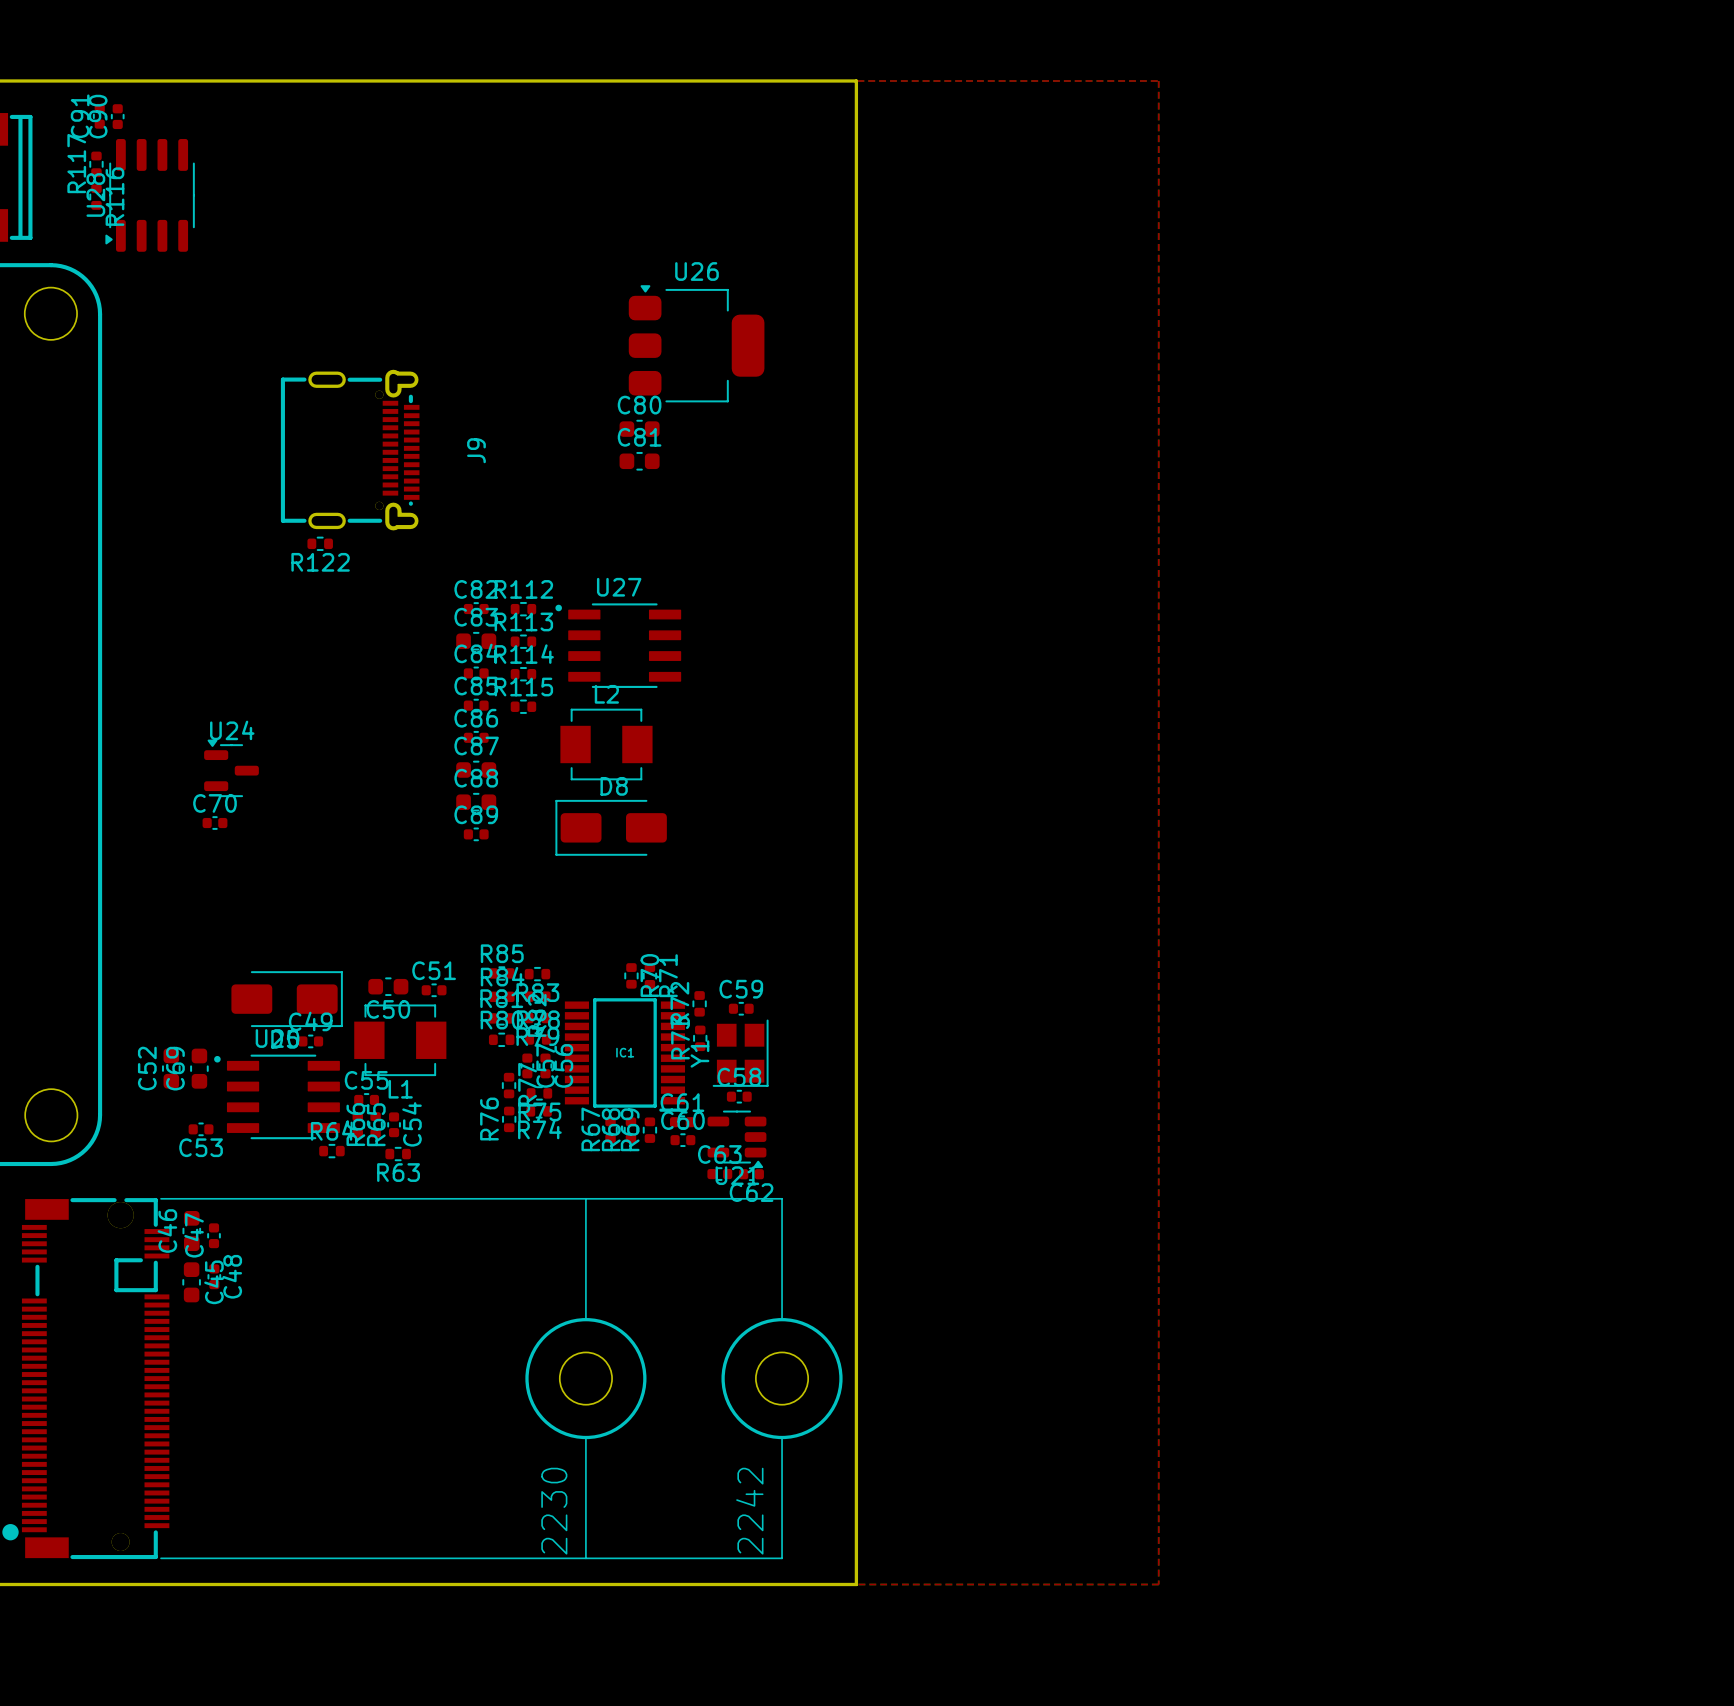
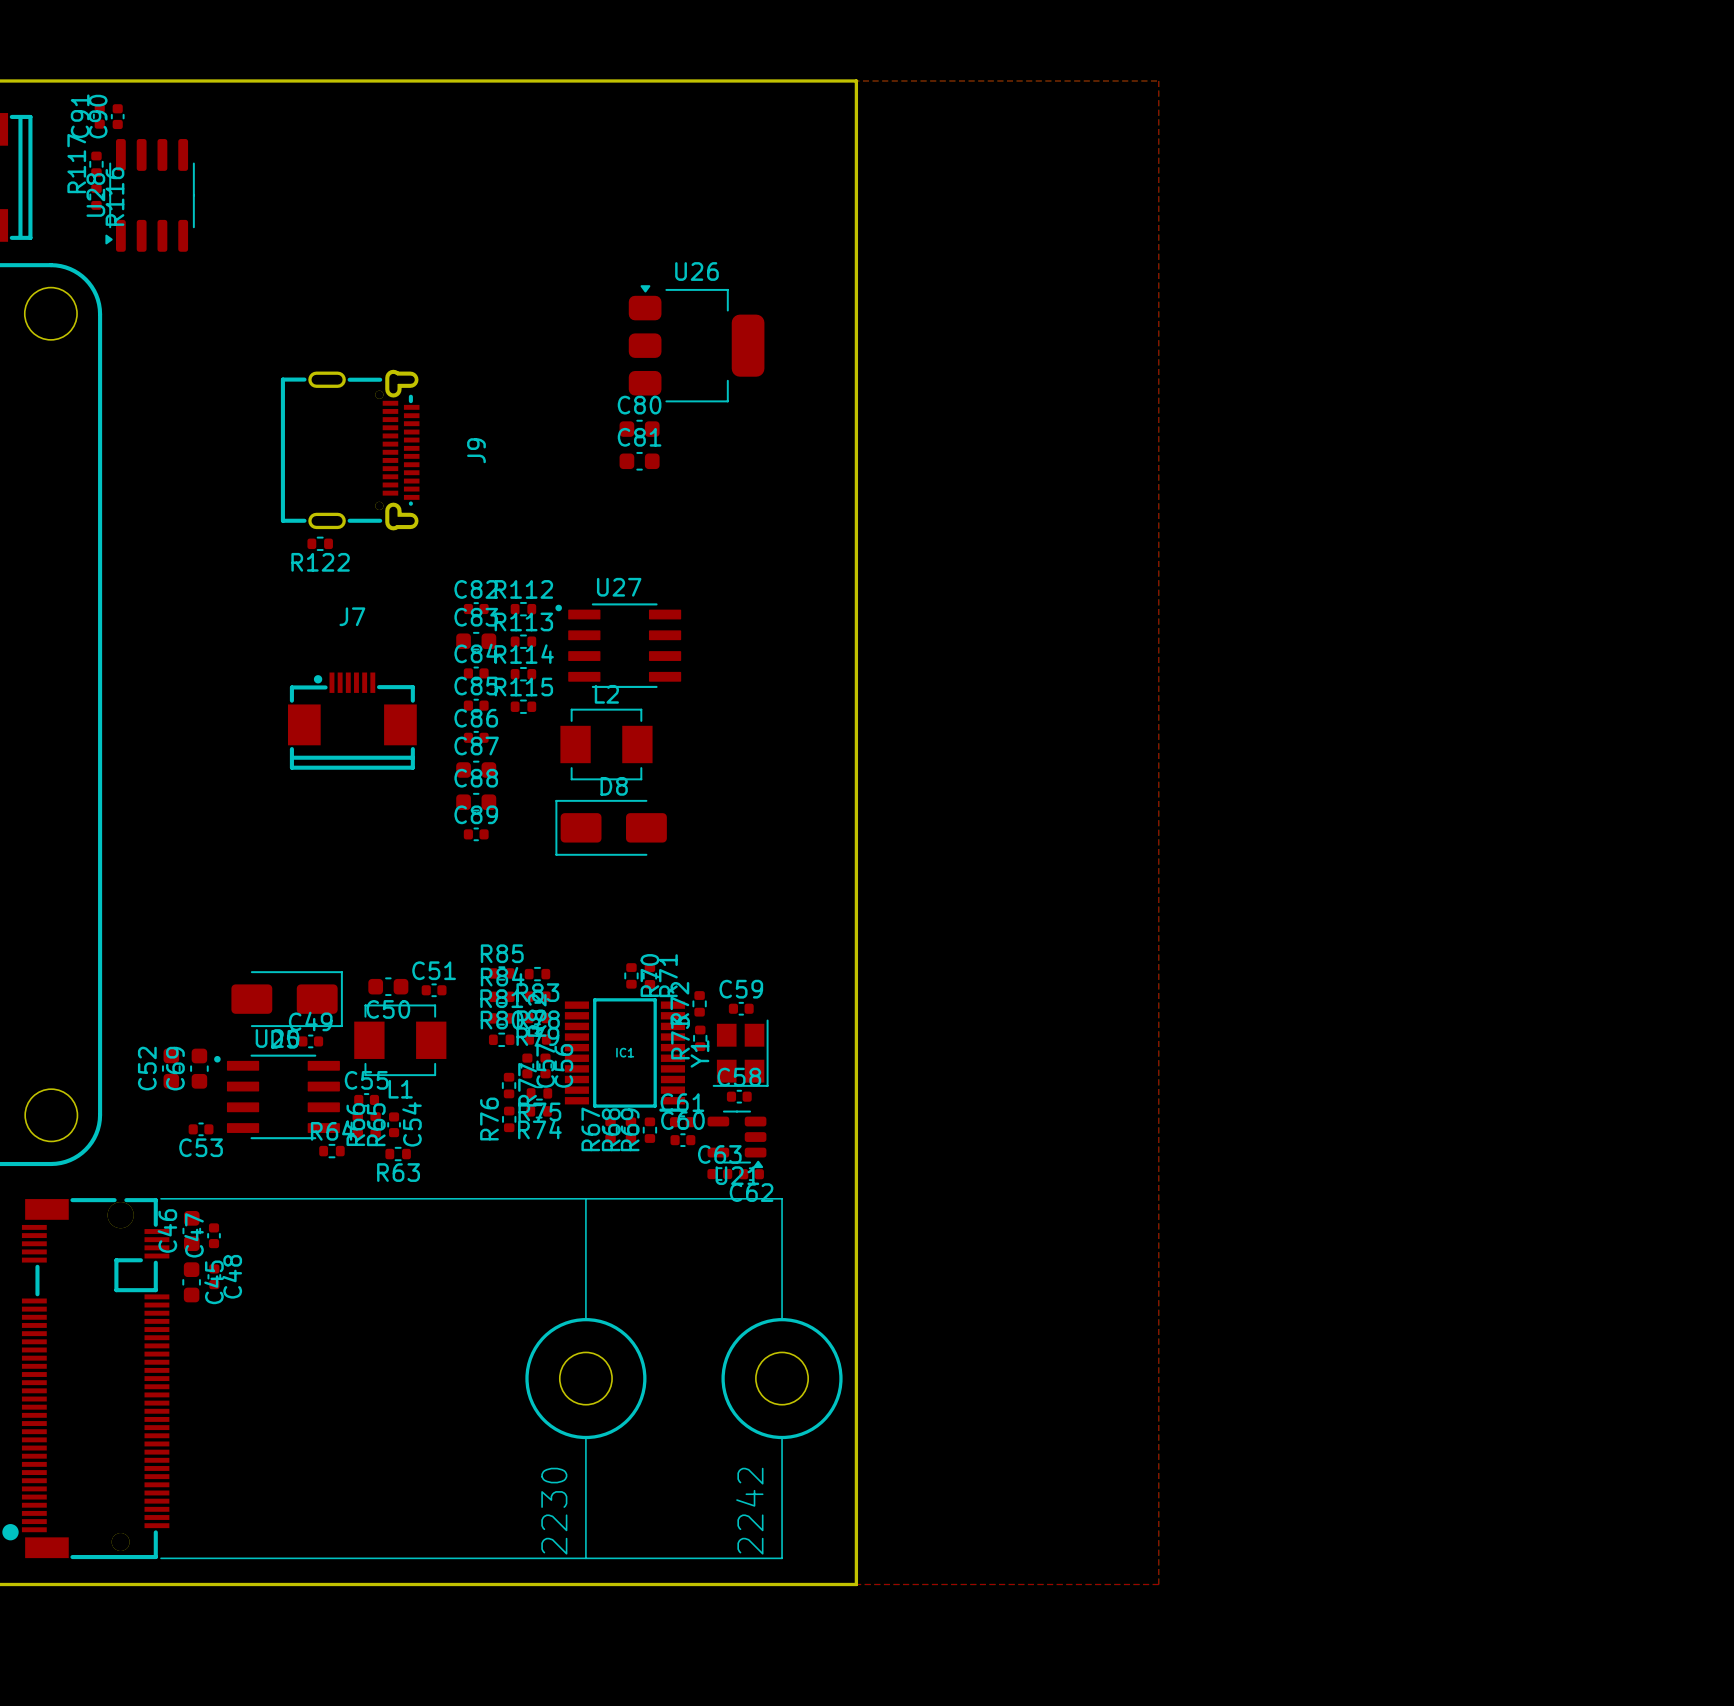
J7: none -> (352, 721)
U24: (231, 768) -> none
C70: (214, 823) -> none

